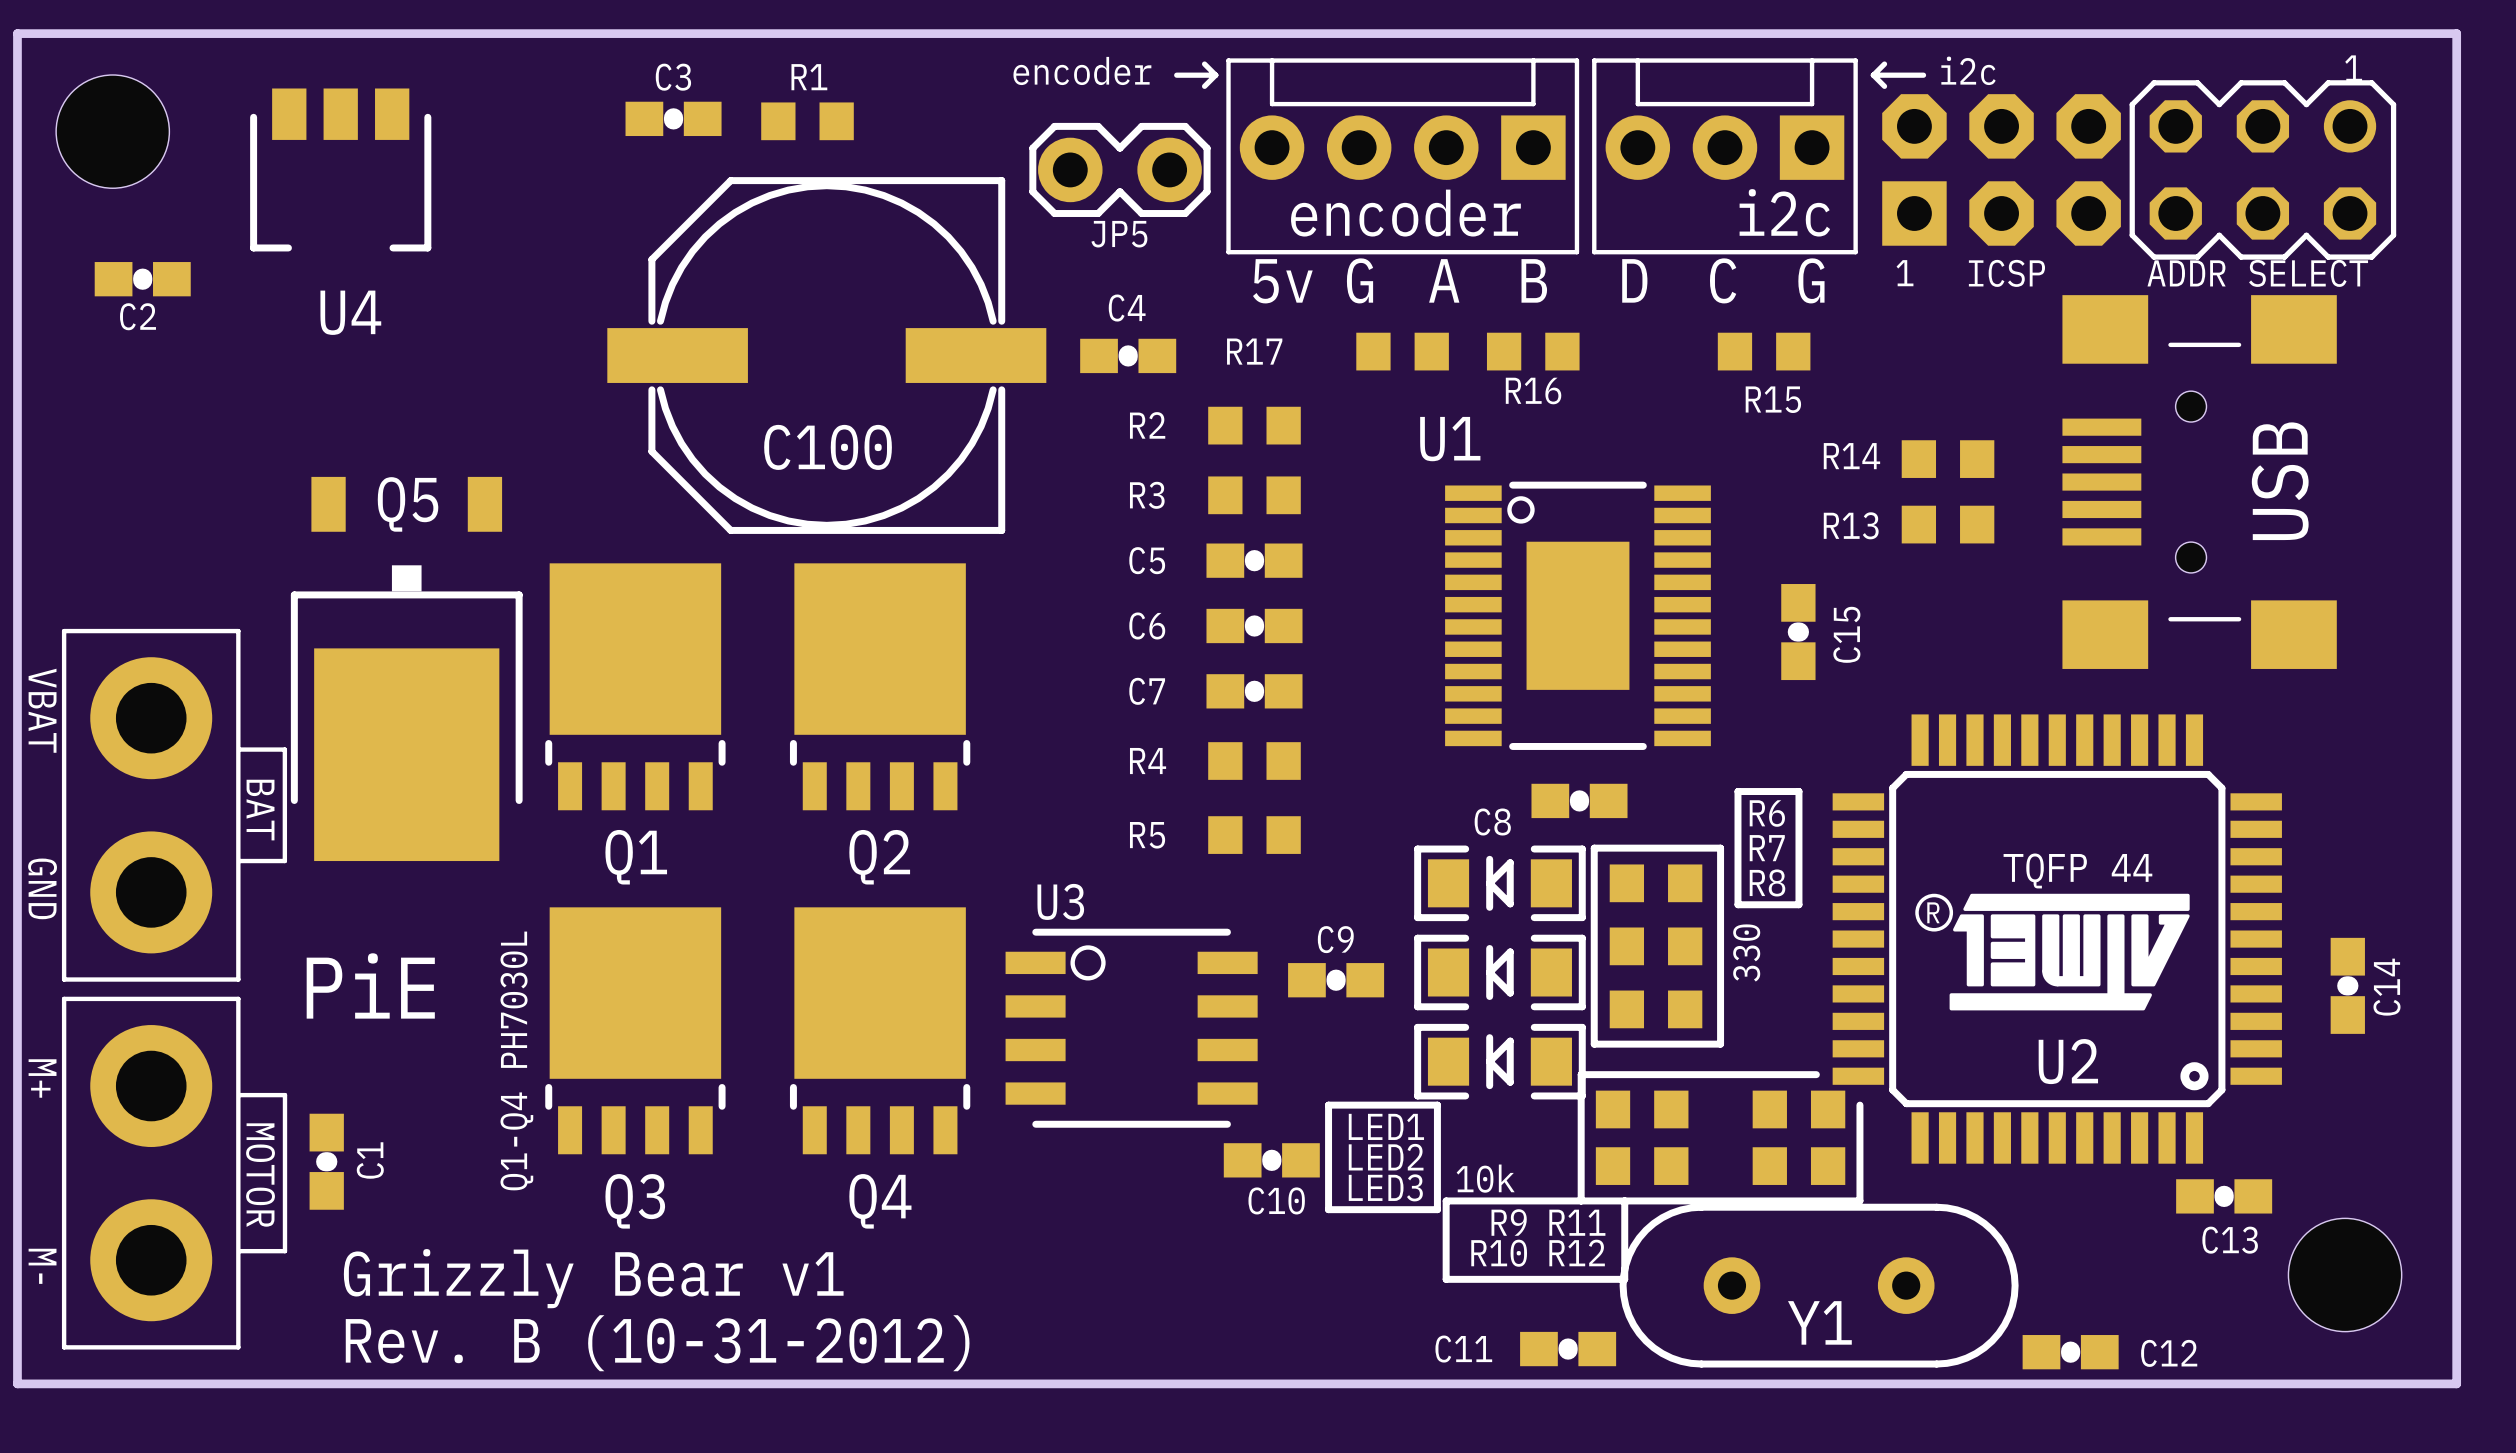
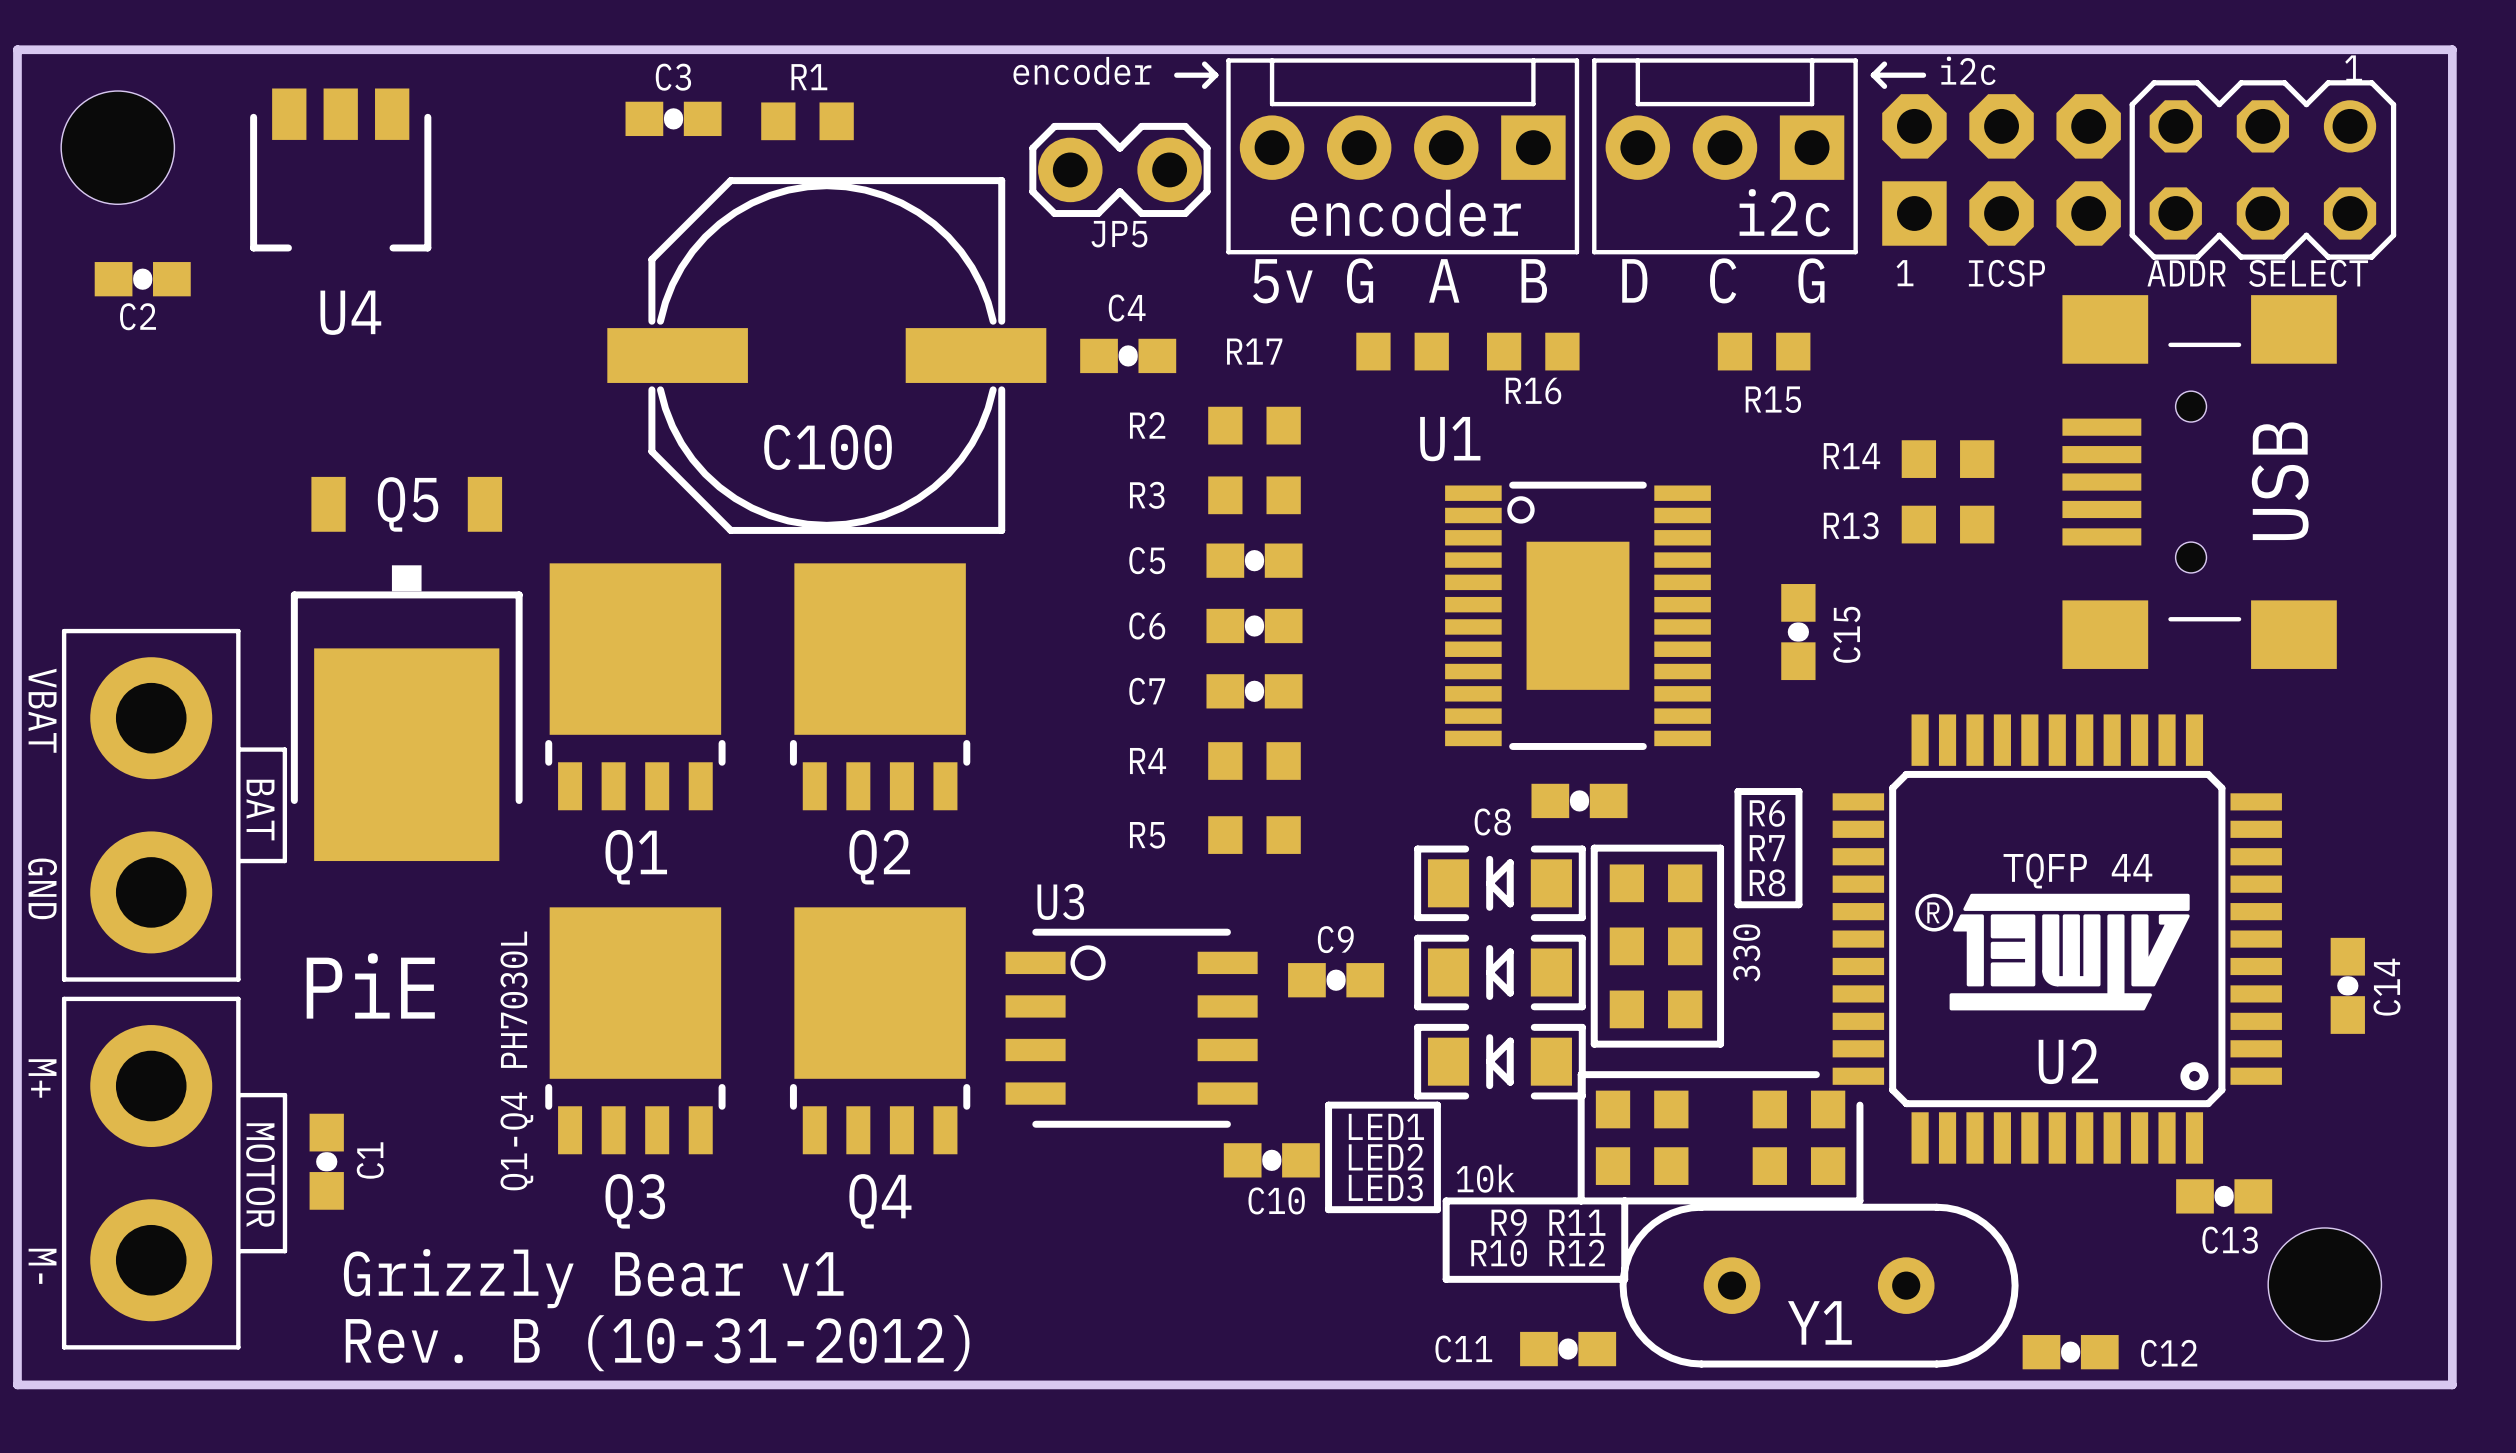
board edge: (17, 49) (17, 33) (2456, 33) (2456, 1383) (17, 1383) -> (17, 49) (2452, 49) (2452, 1384) (17, 1383)
part position: (112, 131) -> (117, 147)
part position: (2345, 1274) -> (2324, 1284)

